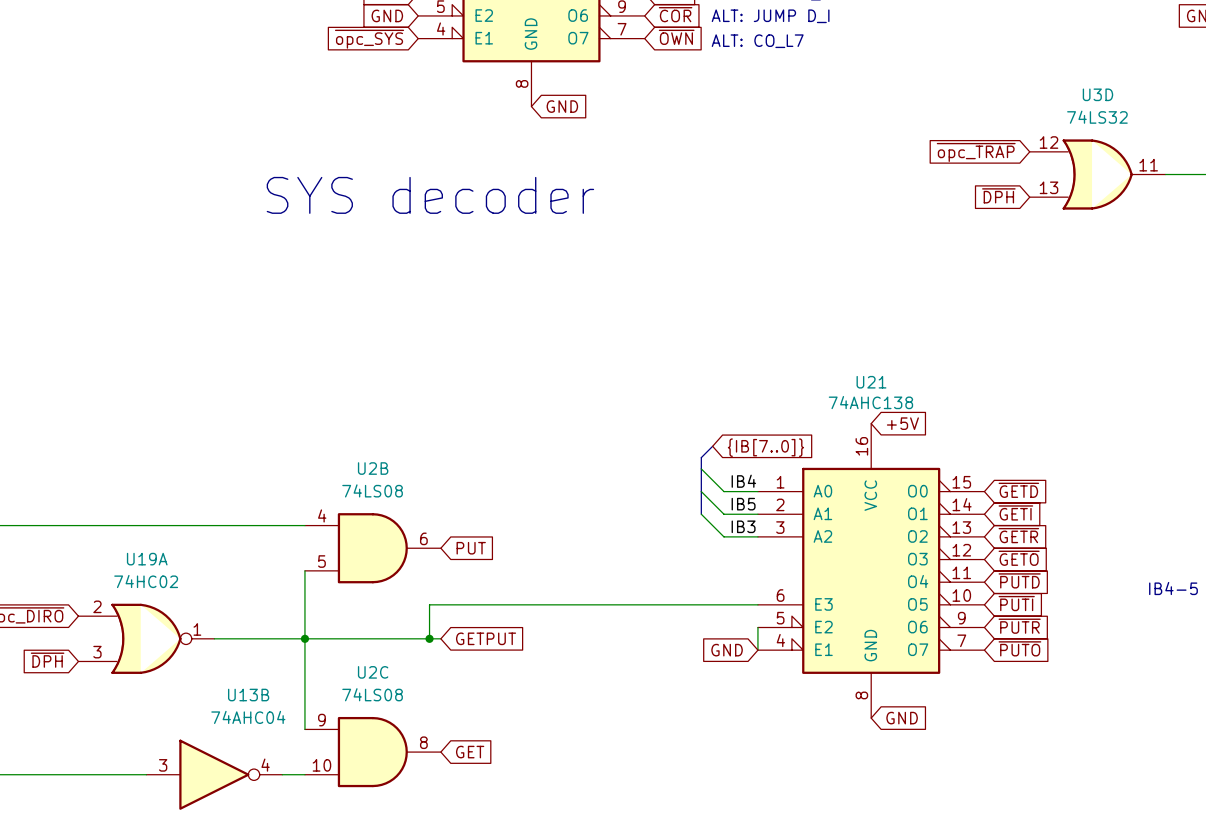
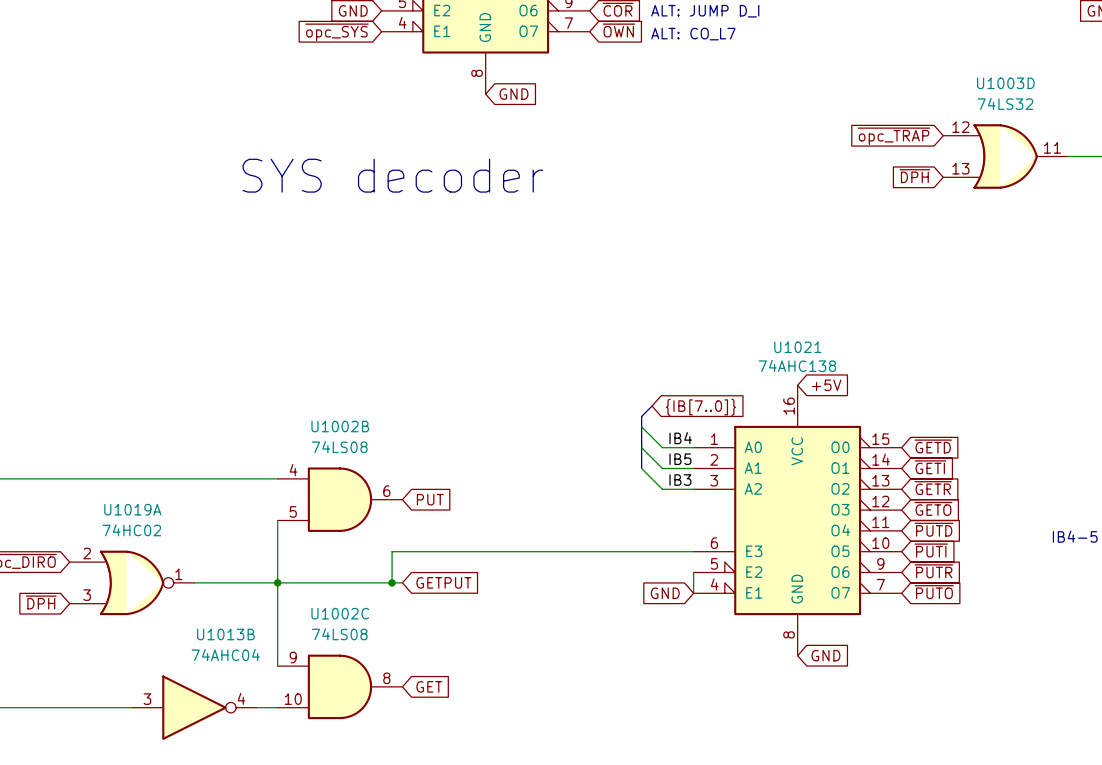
U3D name: U3D (1097, 94) -> U1003D (1005, 83)
U21 name: U21 (871, 382) -> U1021 (797, 347)
U2B name: U2B (373, 468) -> U1002B (340, 426)
U19A name: U19A (147, 559) -> U1019A (132, 509)
U2C name: U2C (373, 672) -> U1002C (340, 613)
U13B name: U13B (248, 695) -> U1013B (225, 634)

